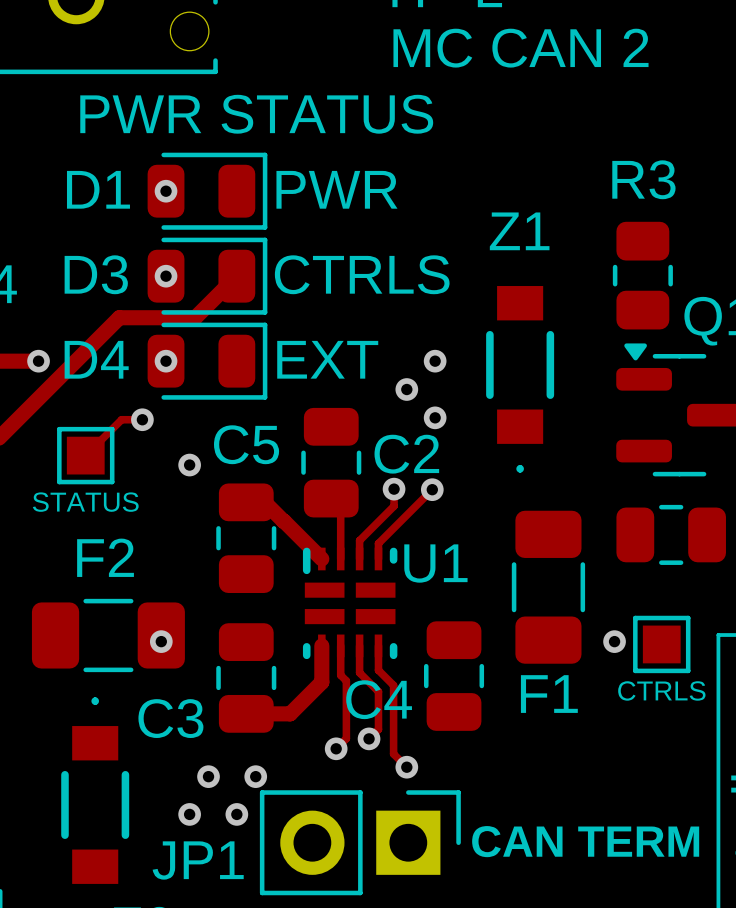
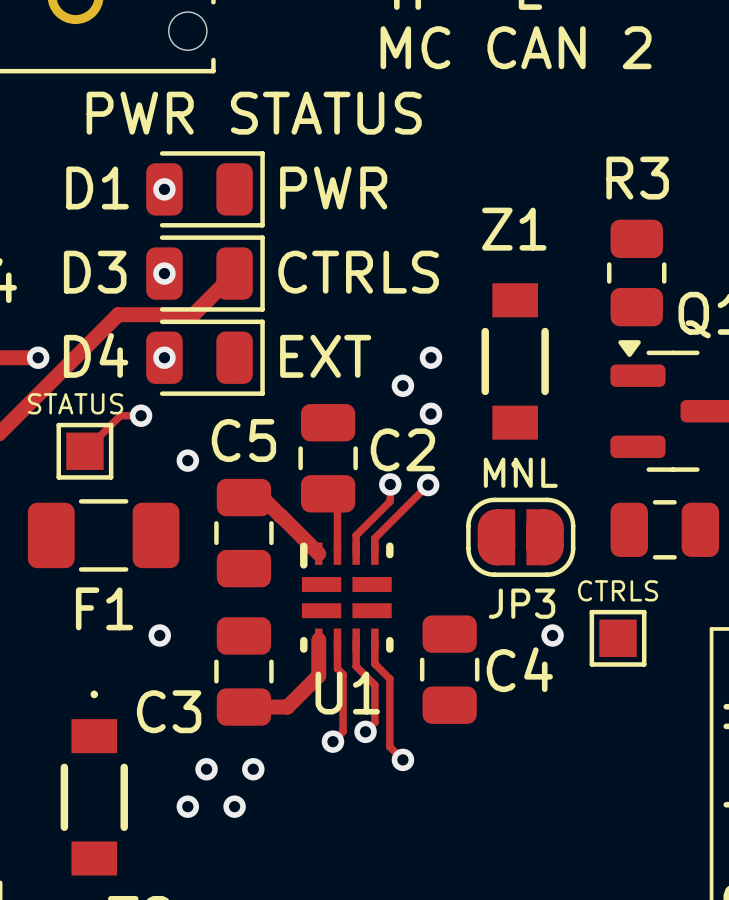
part value position: STATUS (85, 502) -> STATUS (75, 403)
JP3: none -> MNL (520, 537)
U1 name position: U1 (435, 563) -> U1 (347, 693)
F1 rotation: 0° (548, 587) -> 90° clockwise (103, 535)
F1 position: (548, 587) -> (103, 535)
F2: (108, 635) -> none
via position: (614, 641) -> (552, 635)
part position: (661, 644) -> (618, 638)
part value position: CTRLS (661, 690) -> CTRLS (618, 590)
C4 name position: C4 (379, 699) -> C4 (519, 669)
JP1: CAN TERM (360, 842) -> none

